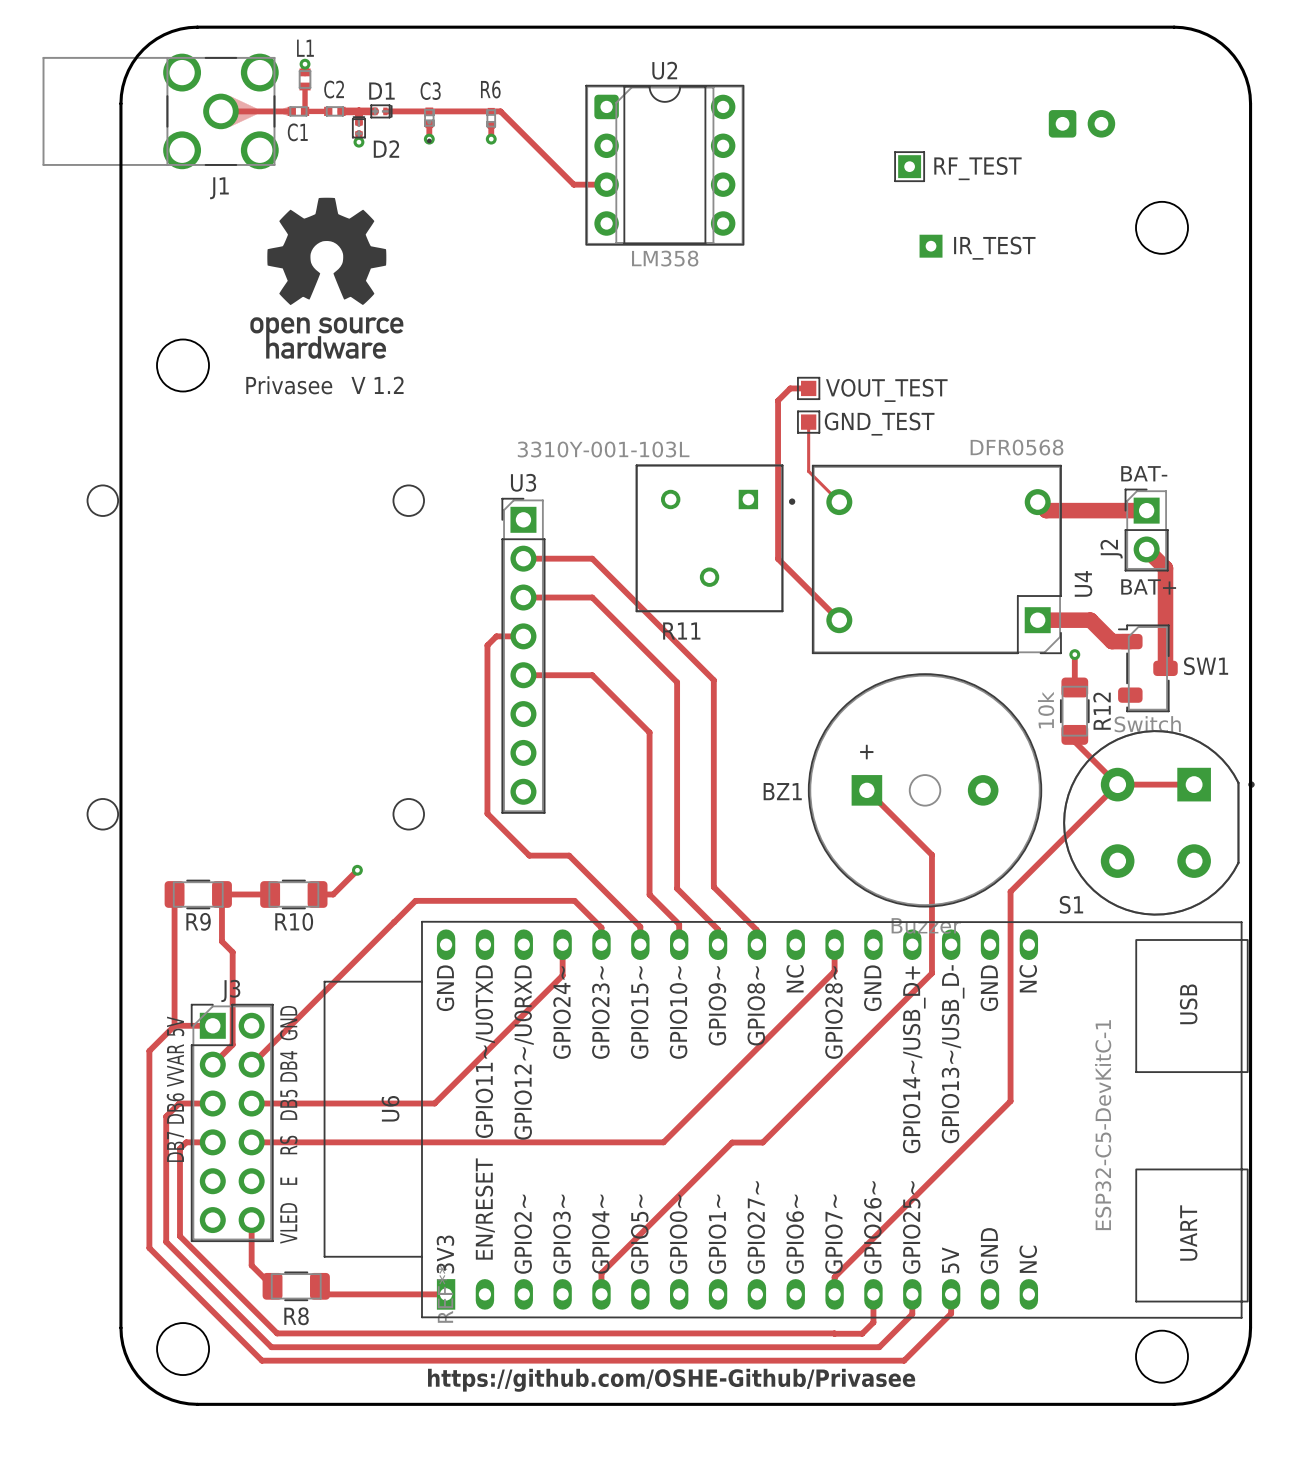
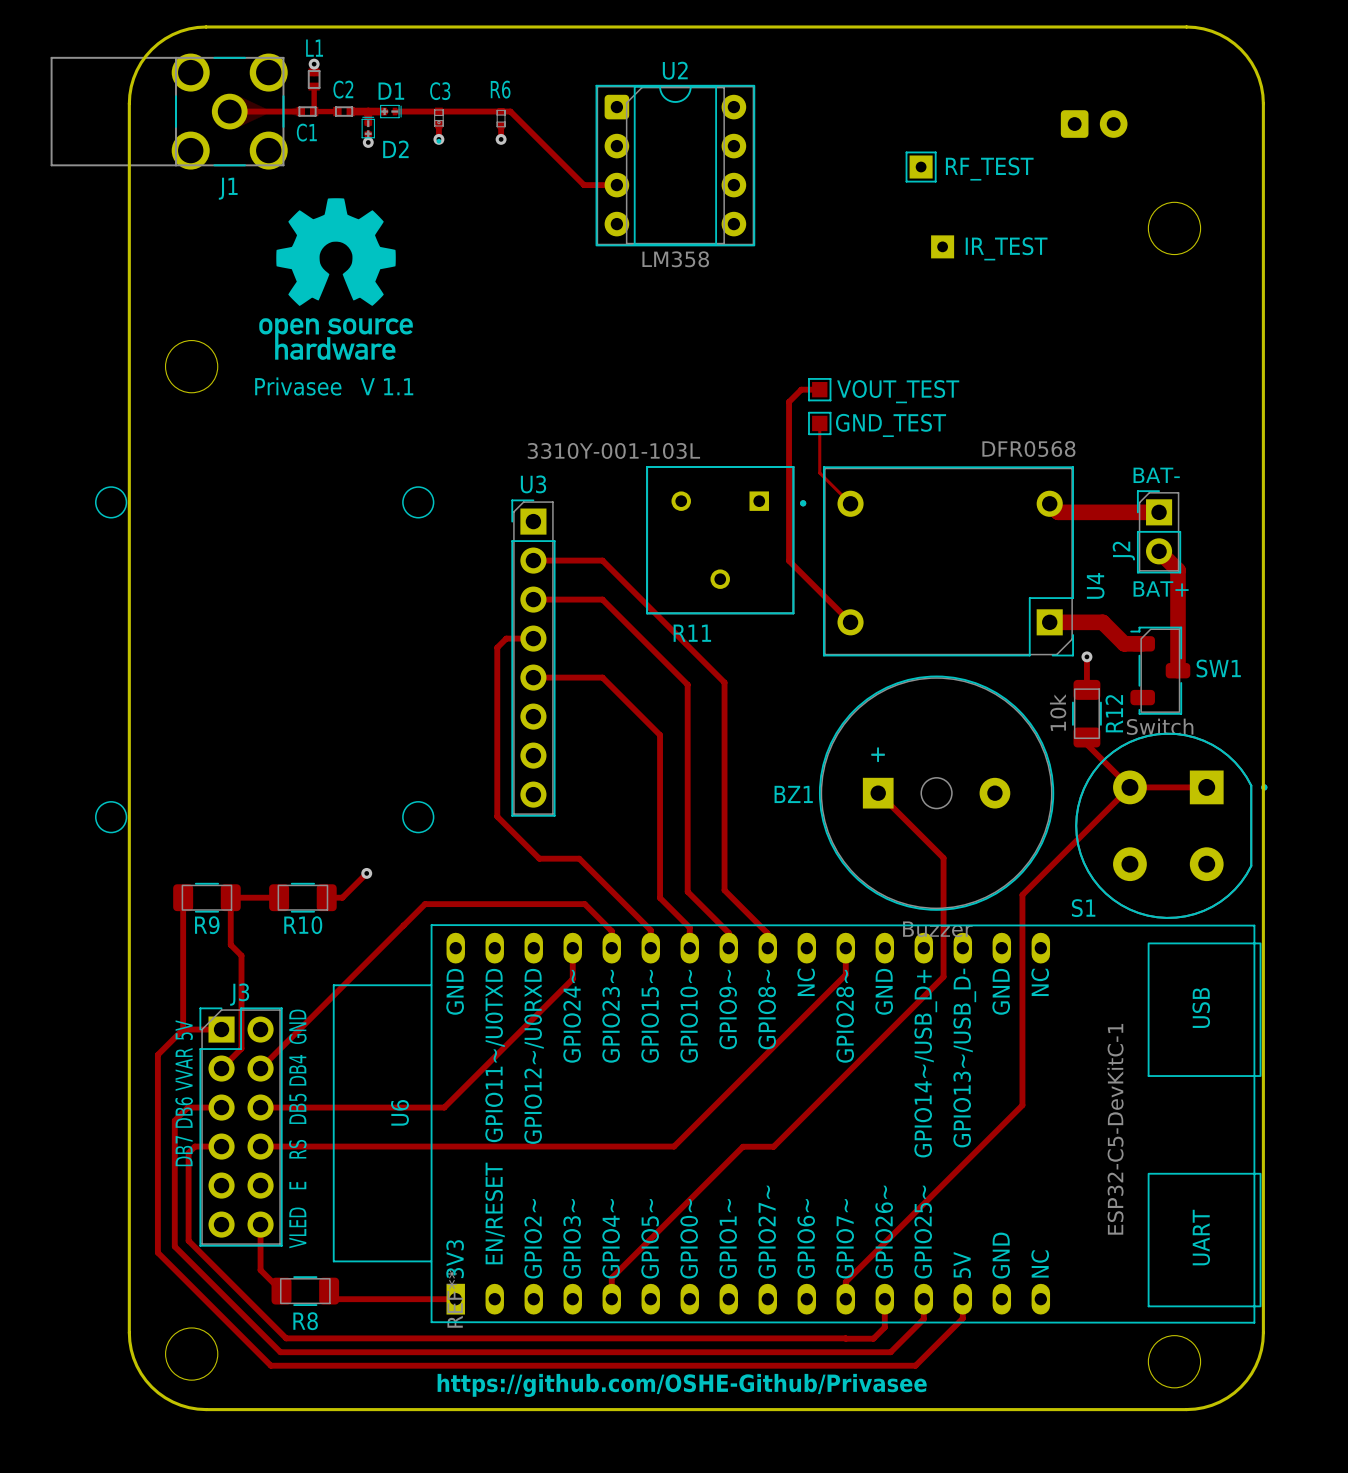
text: V 1.2 (377, 385) -> V 1.1 (387, 386)

